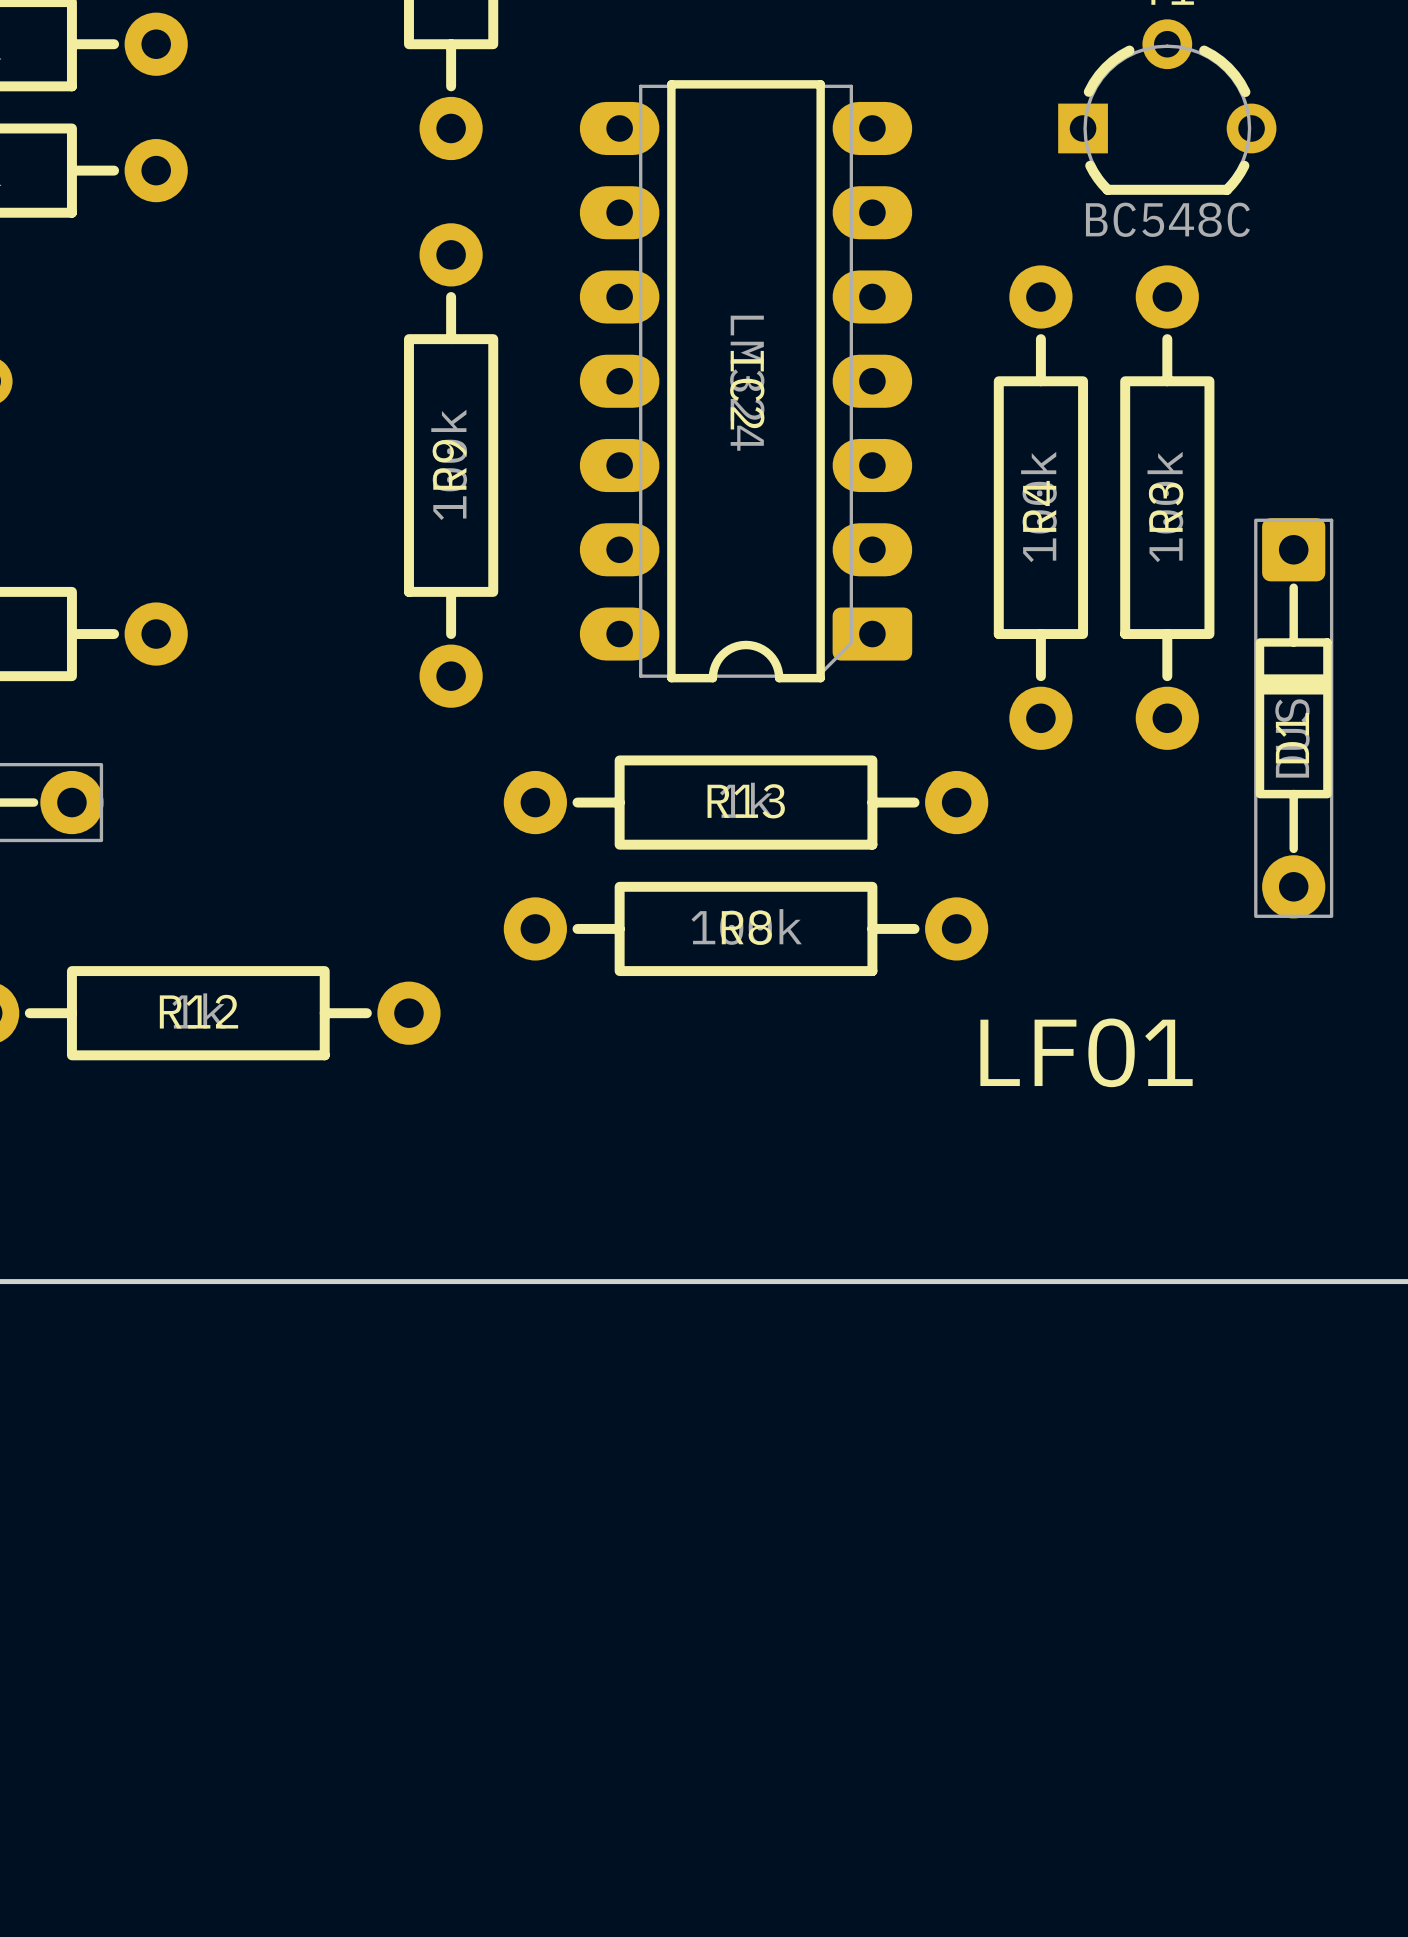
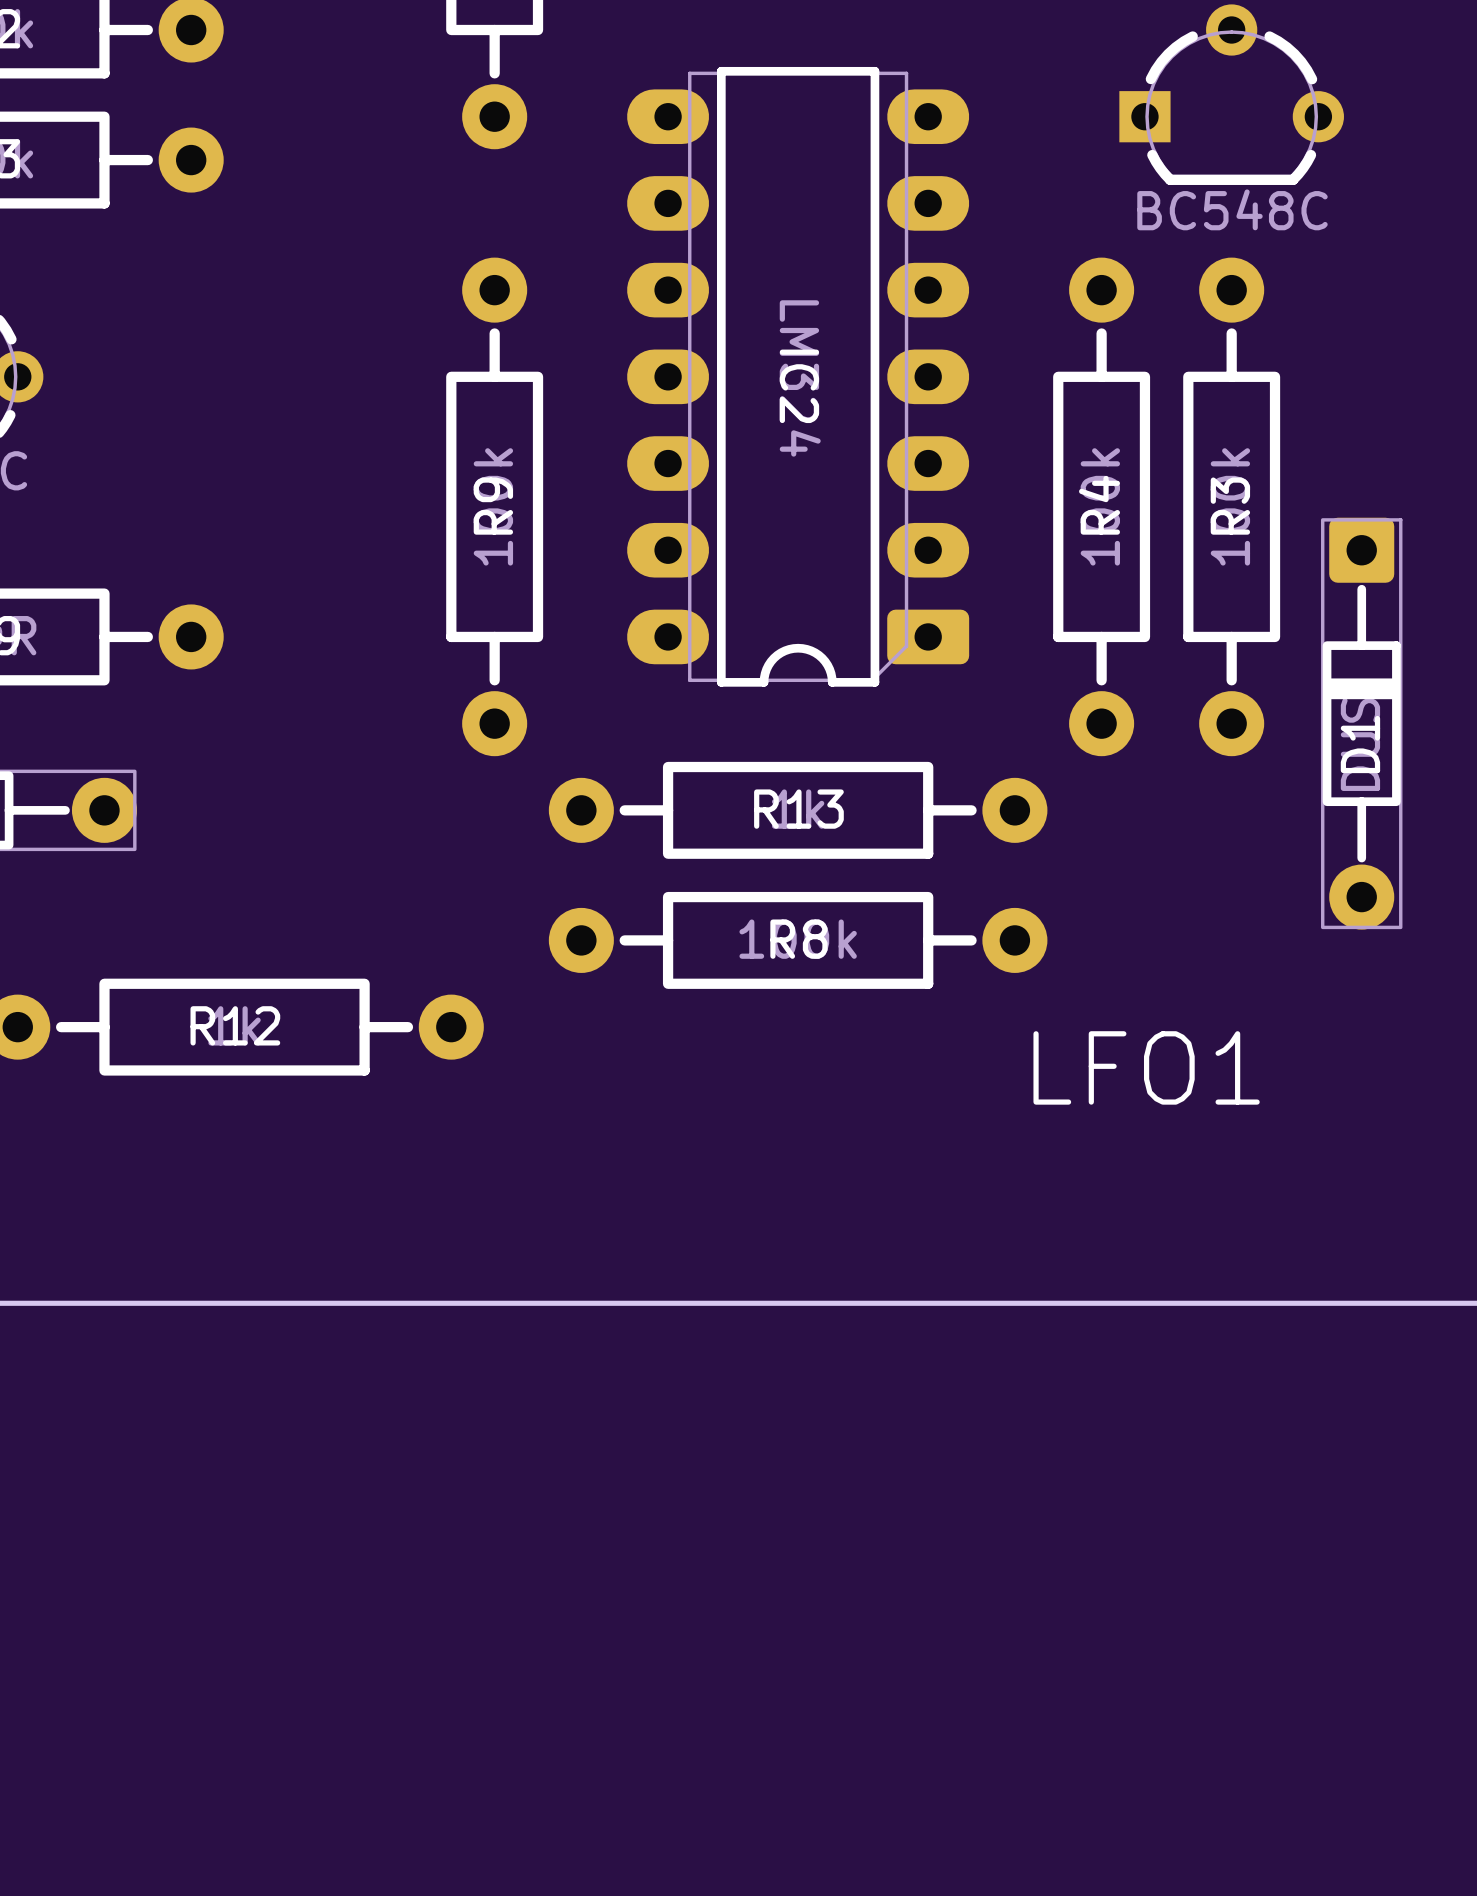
R9 position: (451, 465) -> (494, 506)

